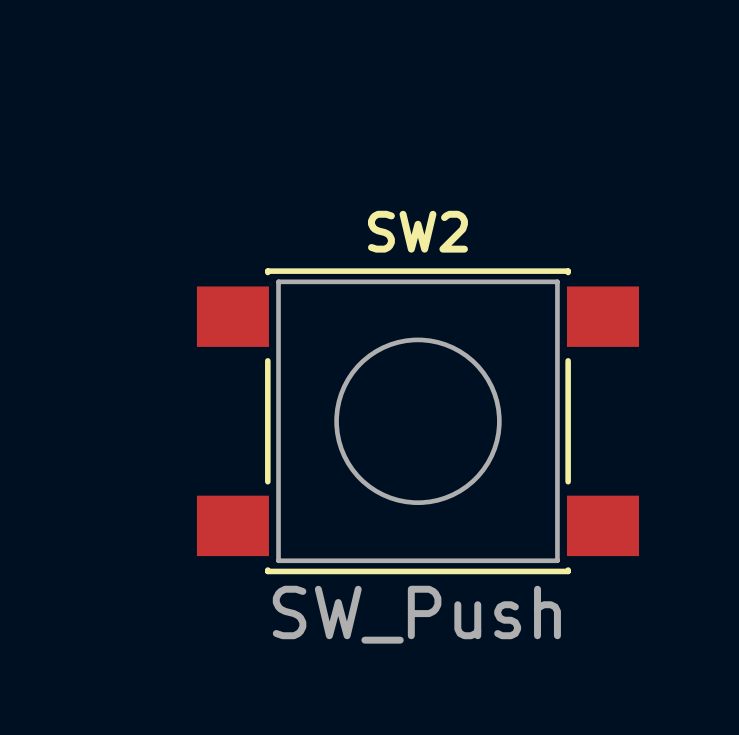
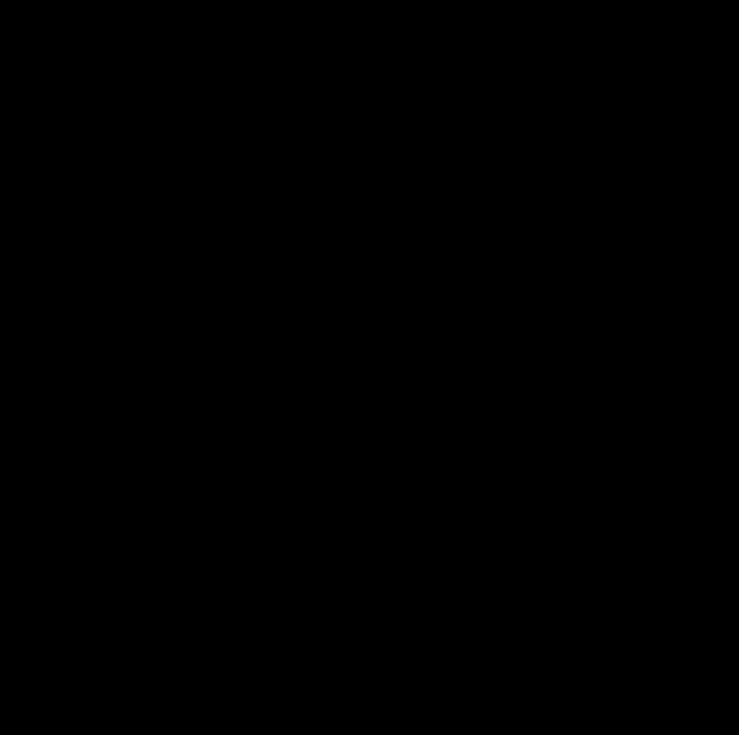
SW2: SW_Push (417, 421) -> none

